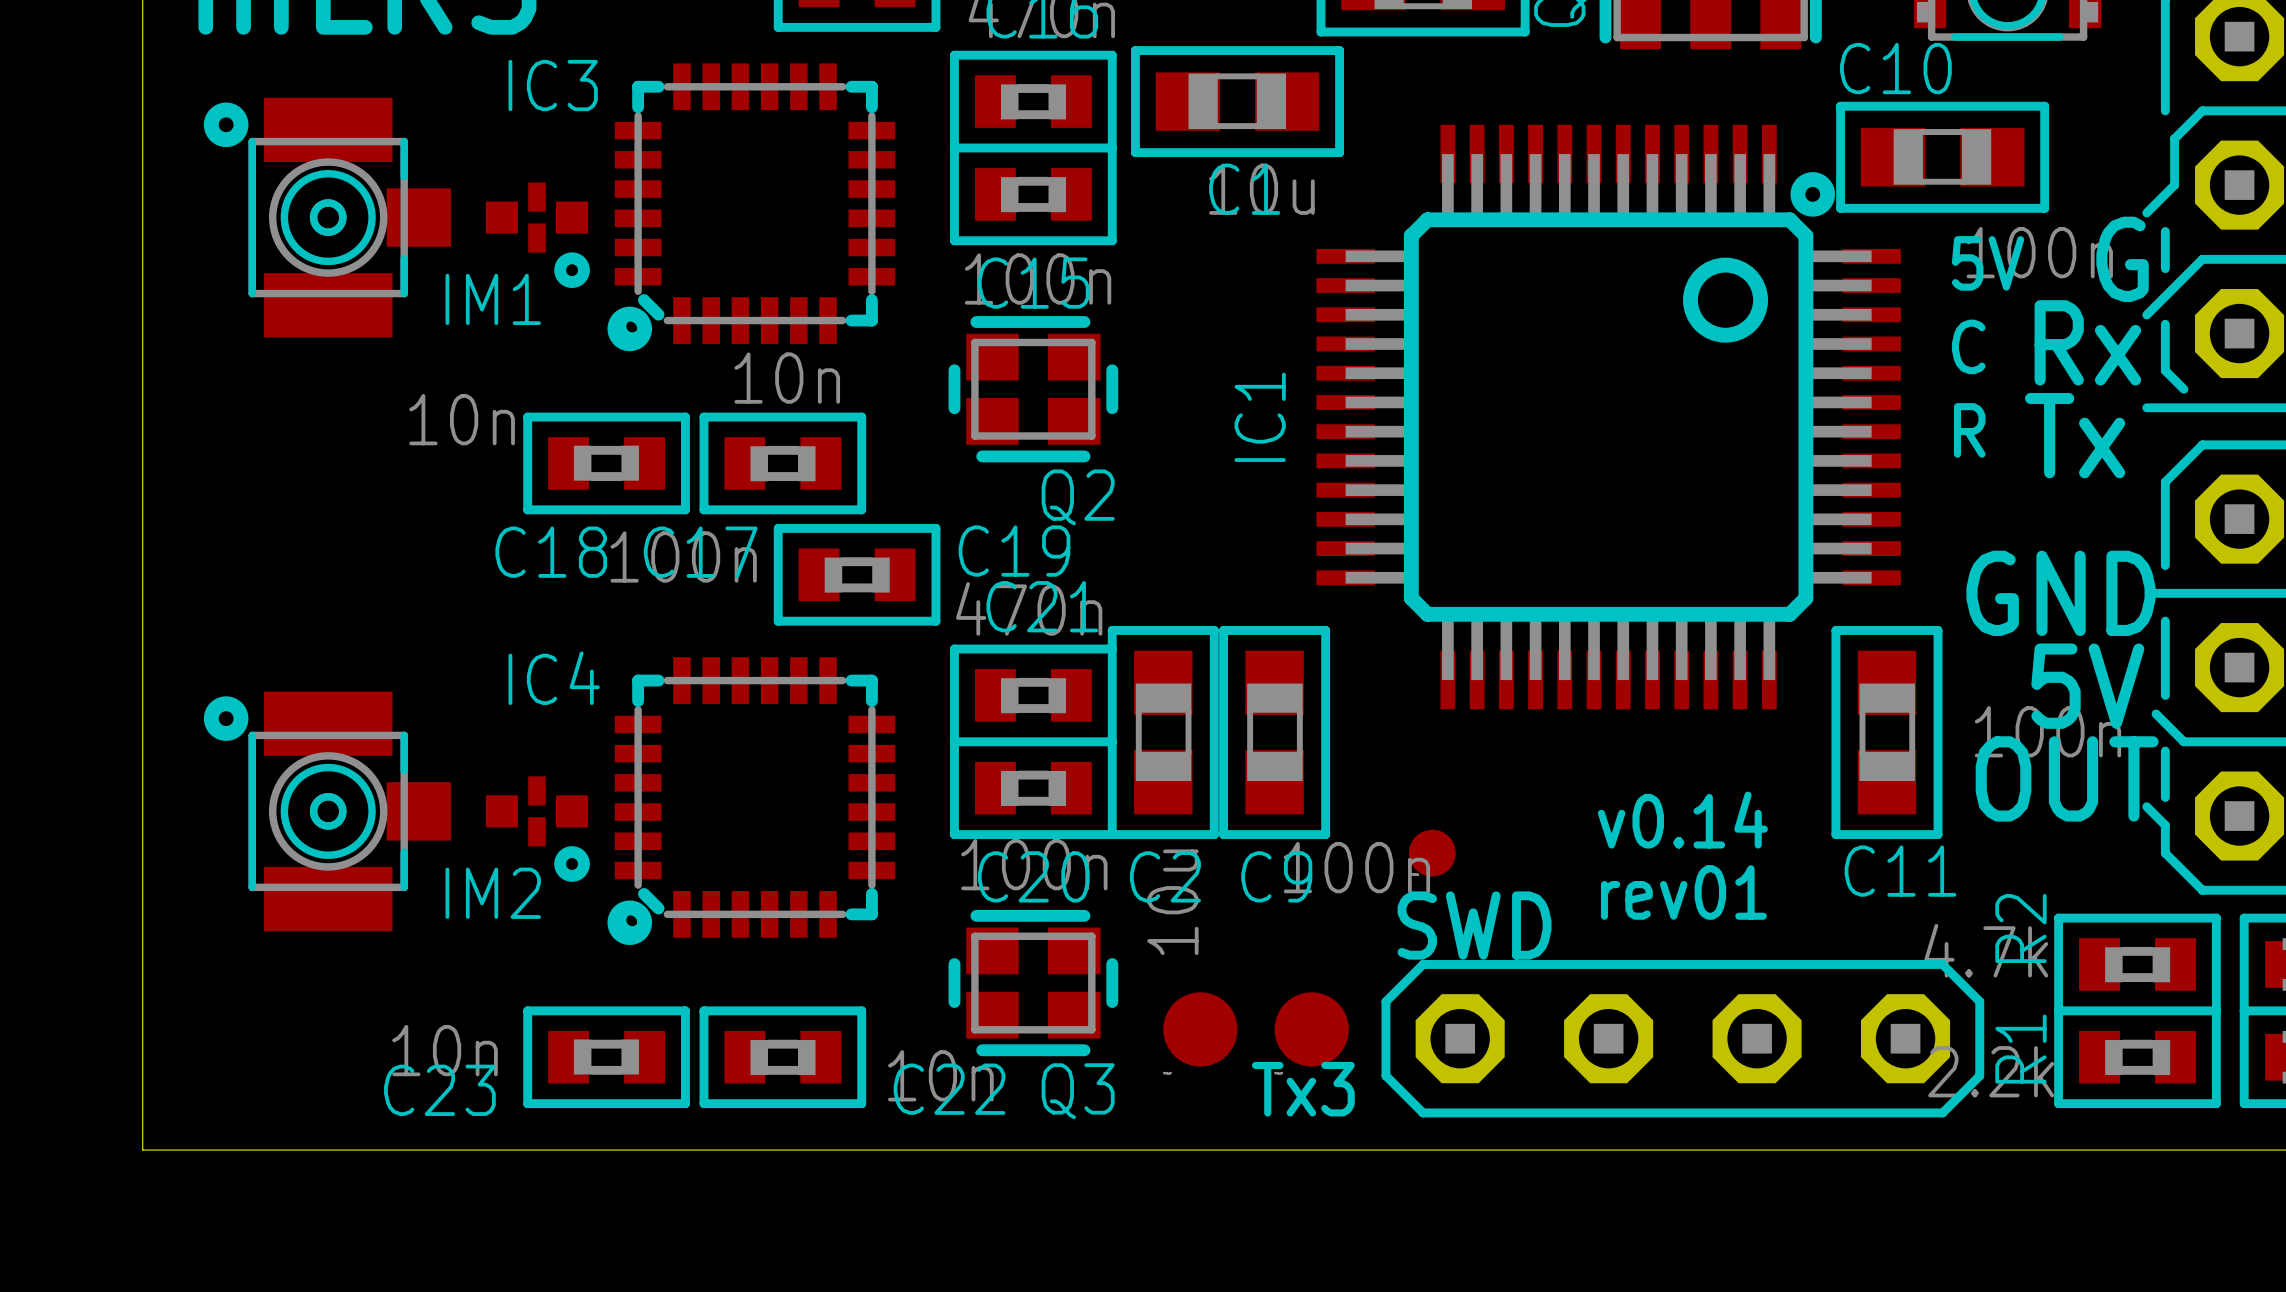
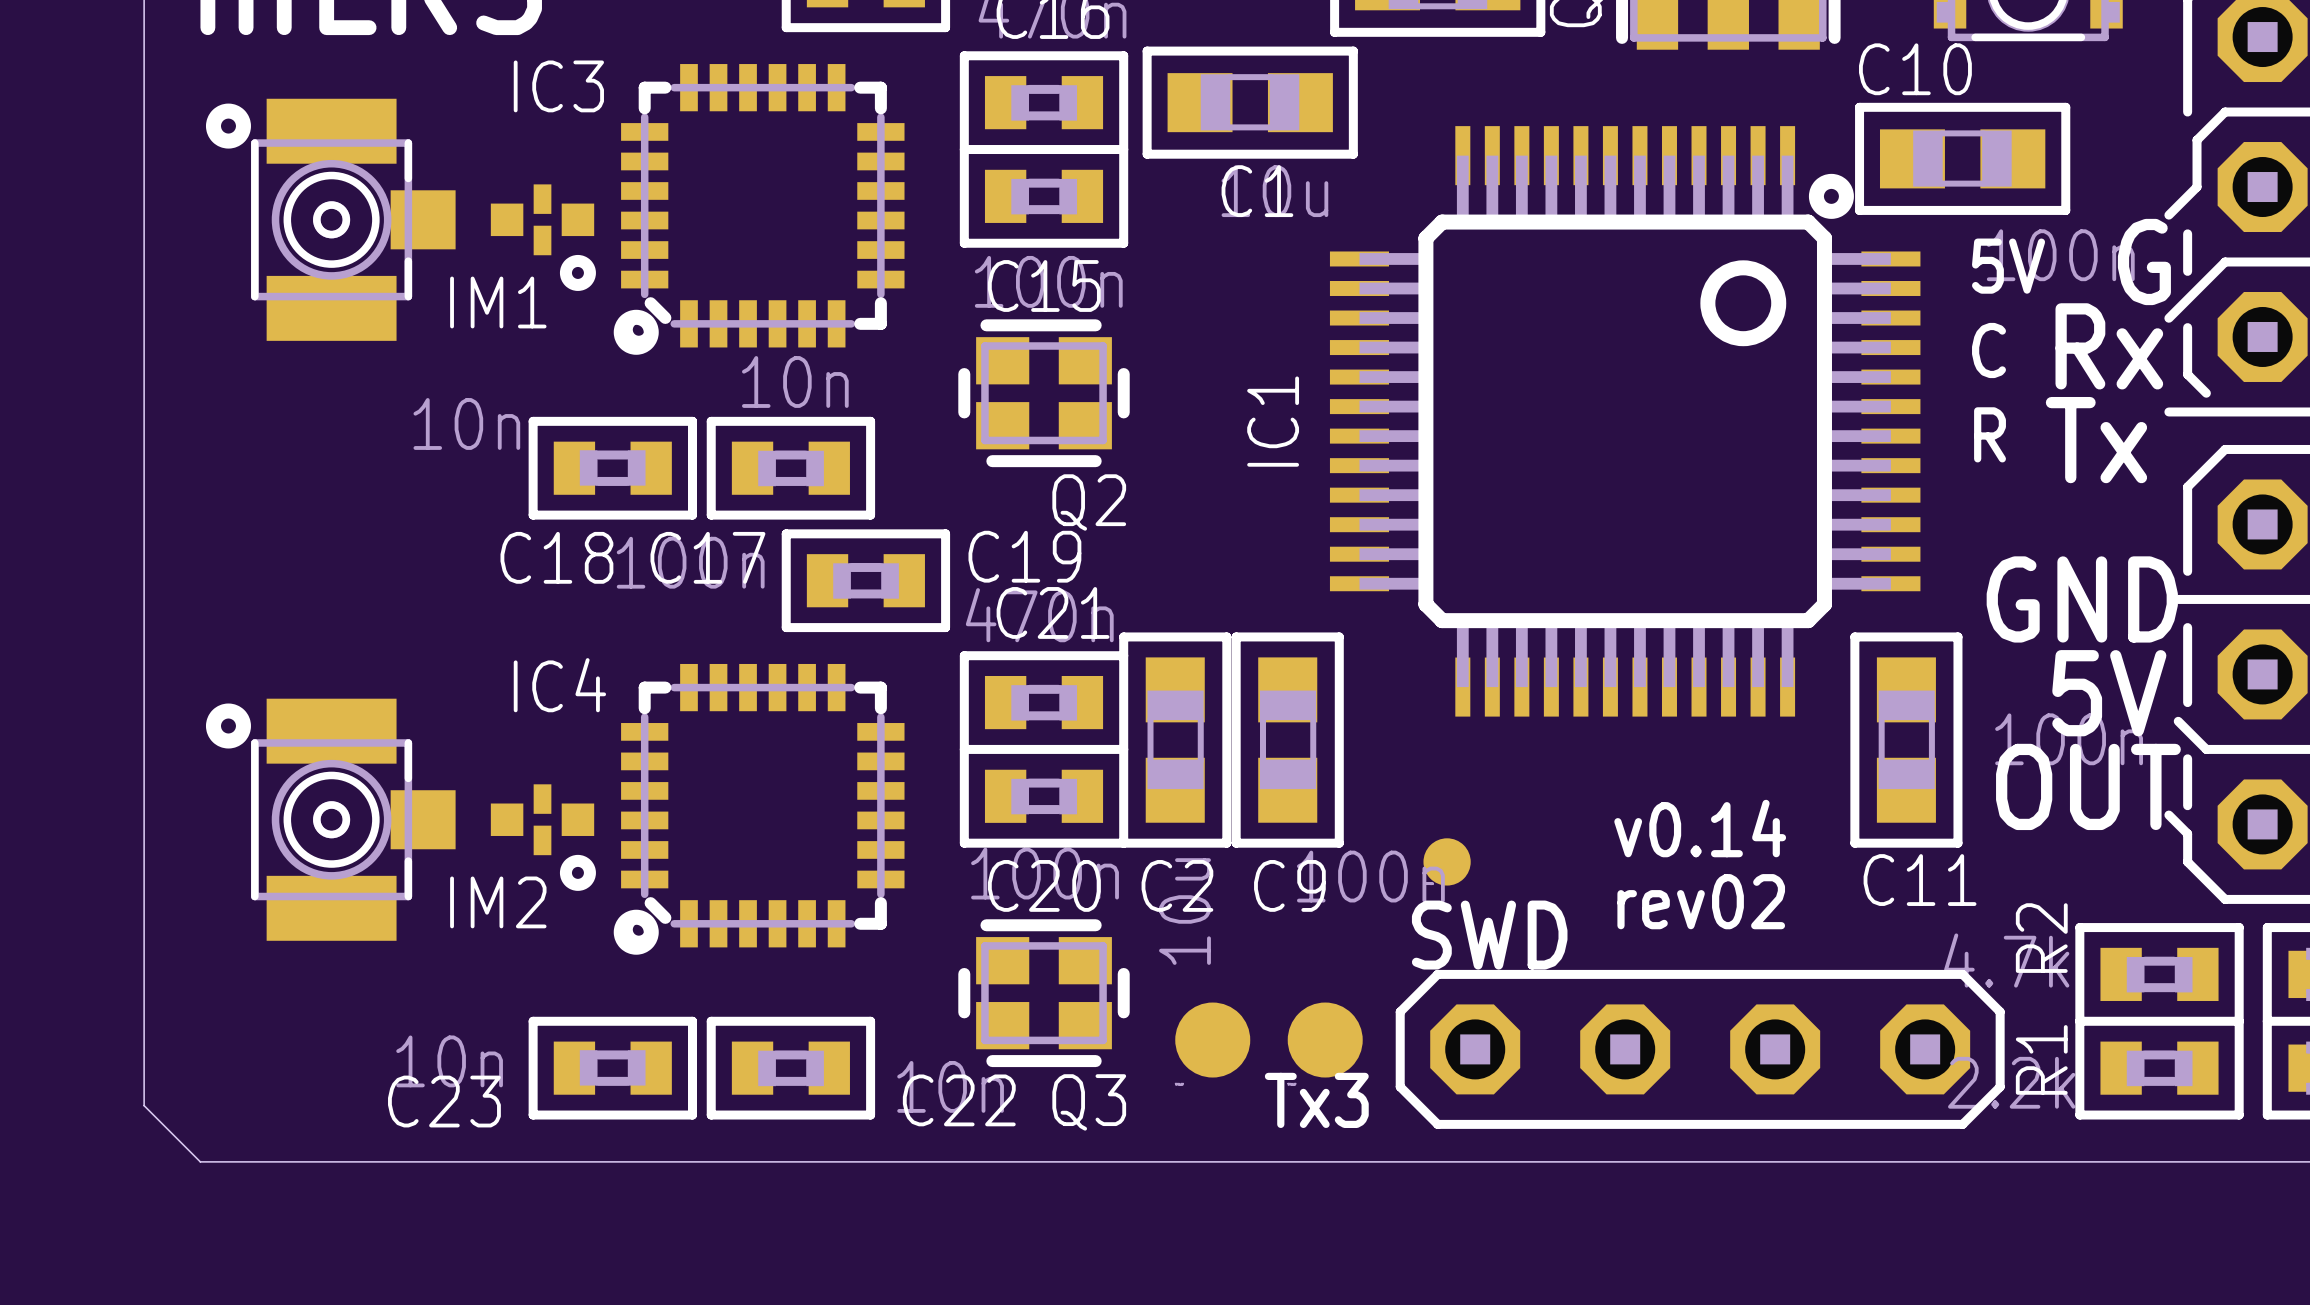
text: rev01 (1683, 892) -> rev02 (1701, 901)
board edge: (142, 1094) (142, 1150) (198, 1150) -> (144, 1105) (200, 1161)

